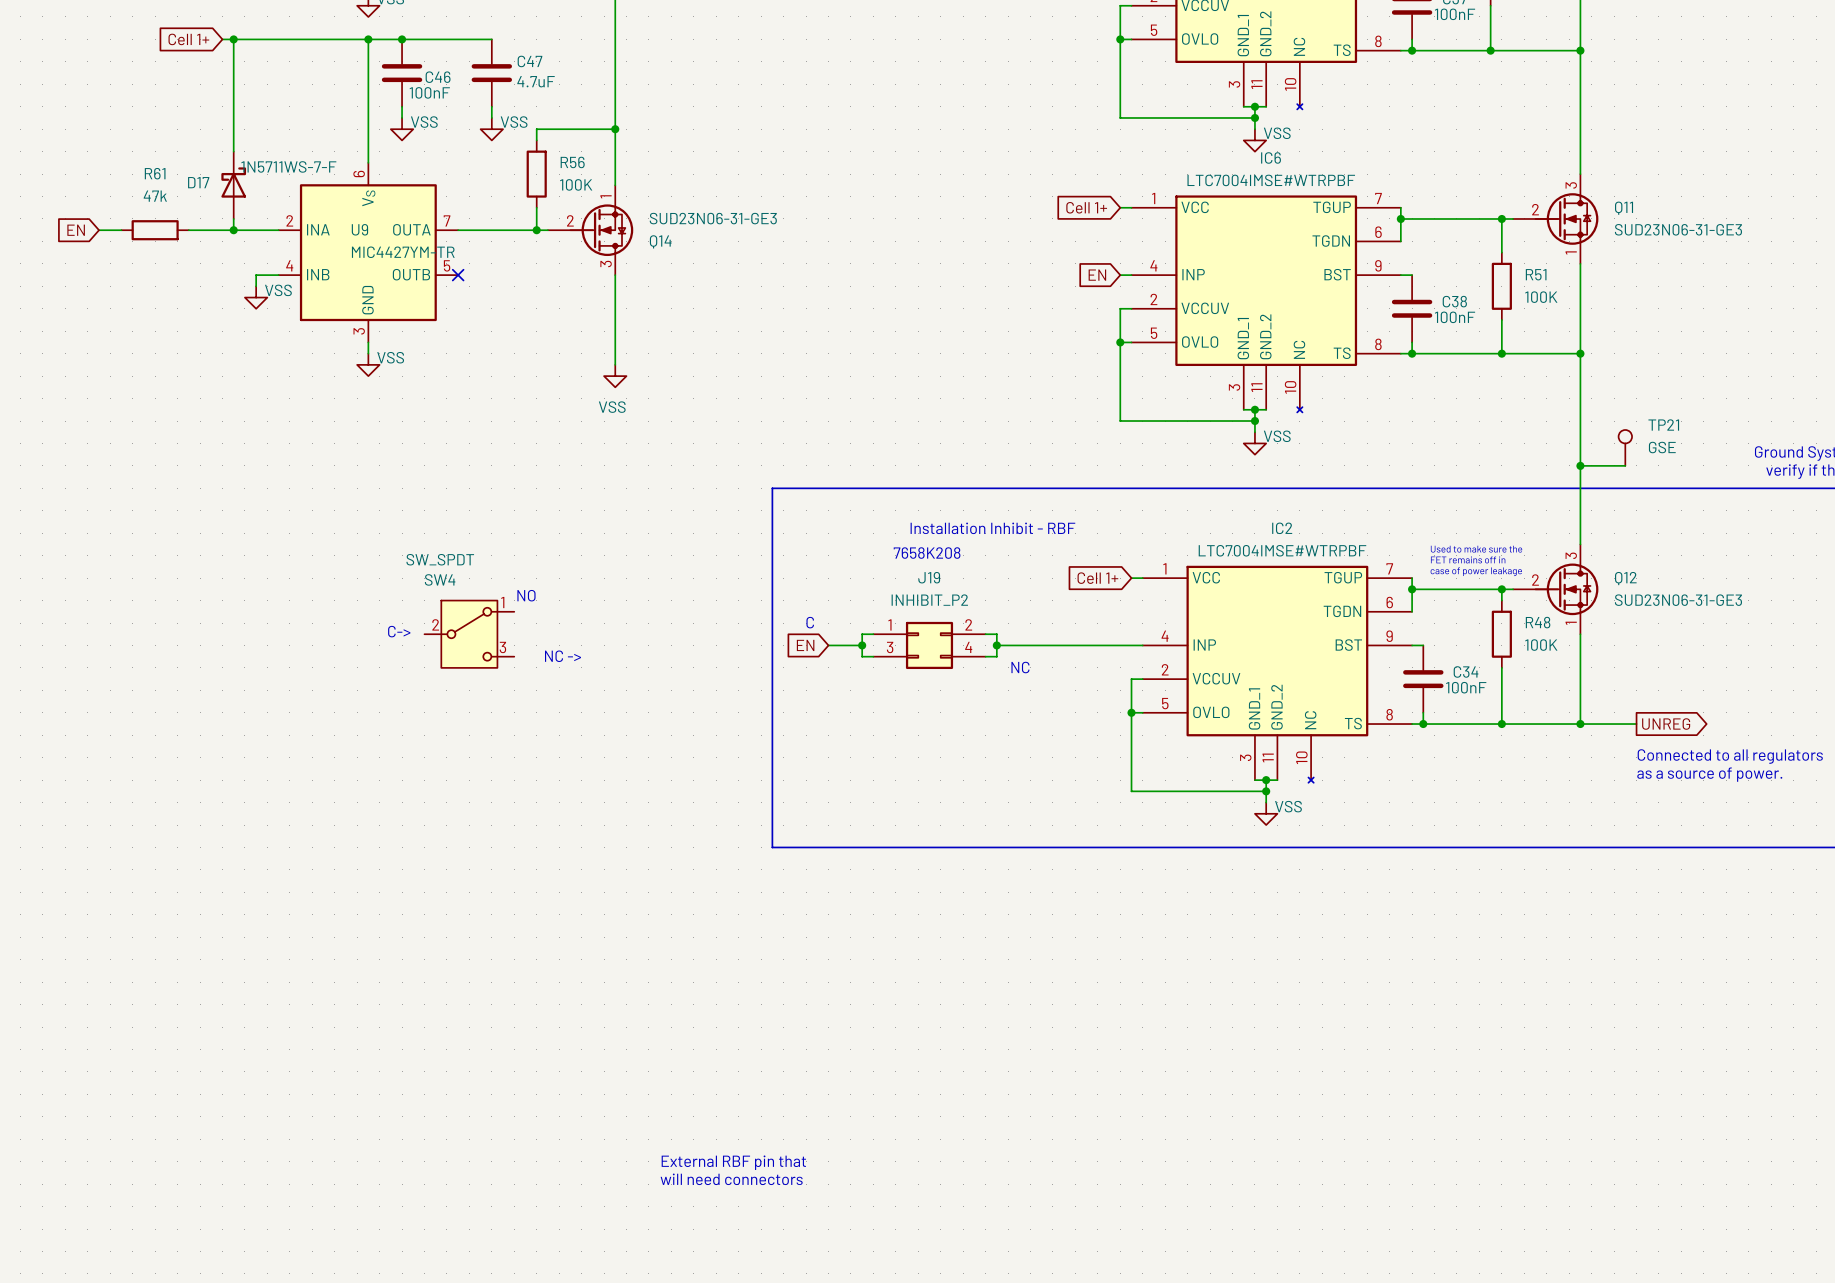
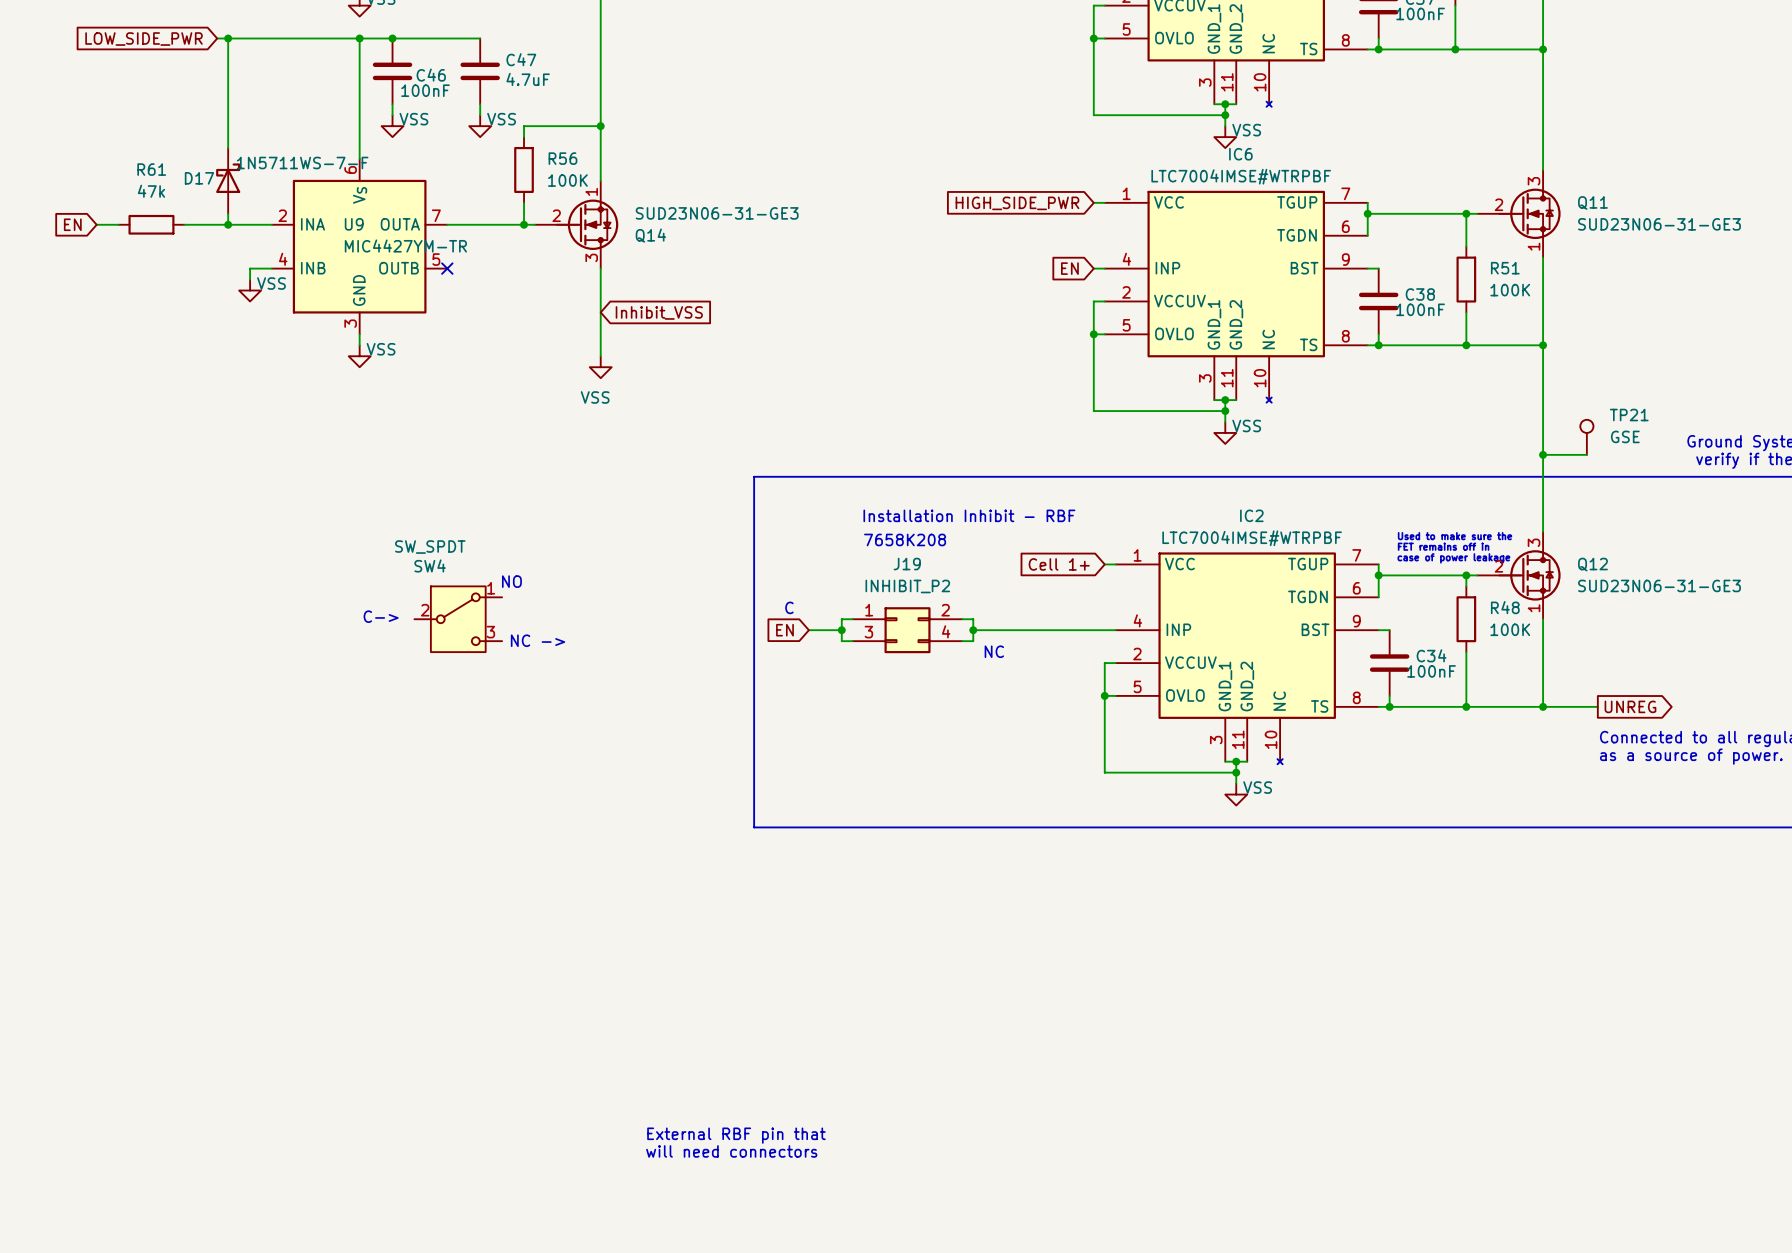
global label: Cell 1+ (188, 39) -> LOW_SIDE_PWR (144, 39)
global label: Cell 1+ (1086, 207) -> HIGH_SIDE_PWR (1017, 203)
global label: none -> Inhibit_VSS (659, 312)

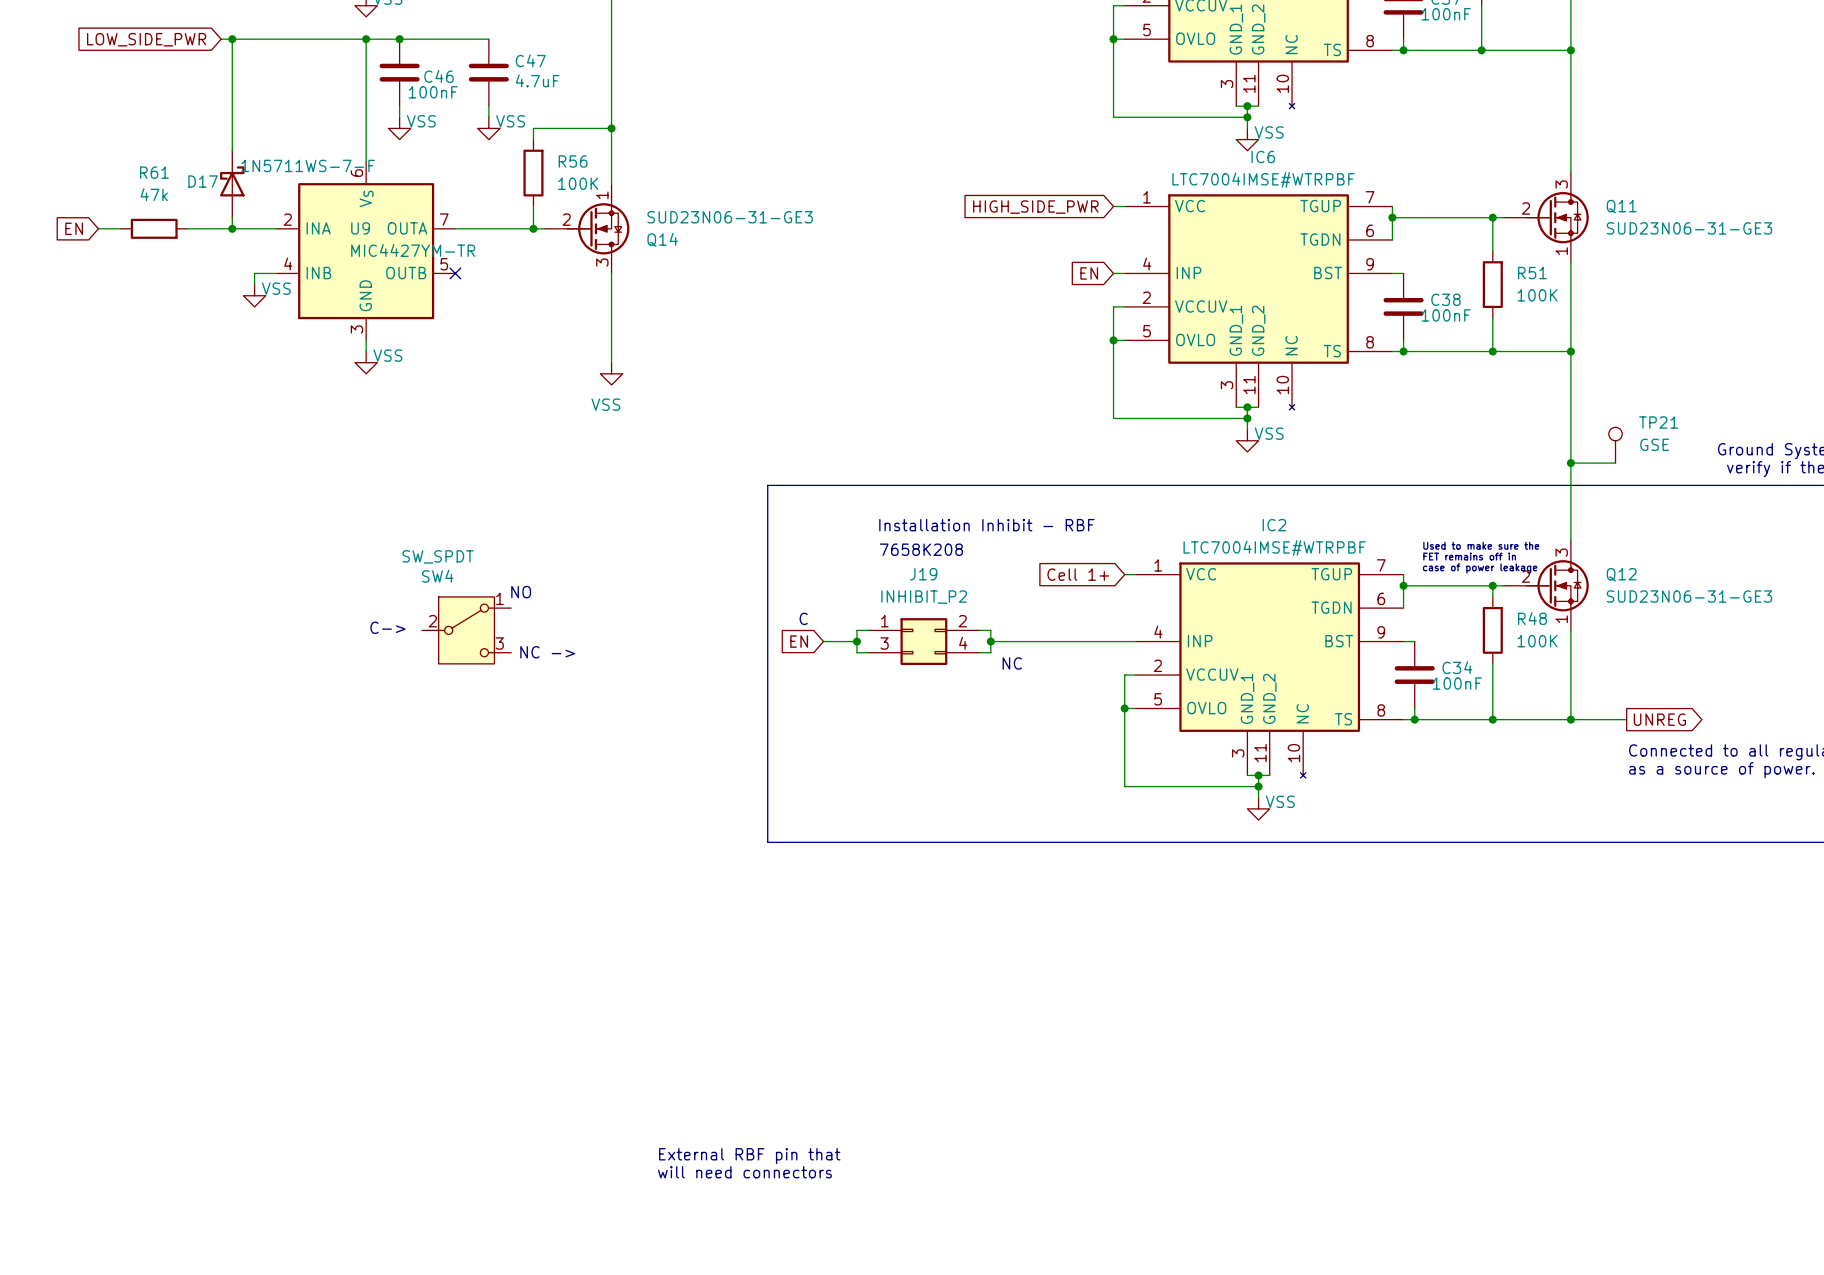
global label: Inhibit_VSS (659, 312) -> none

